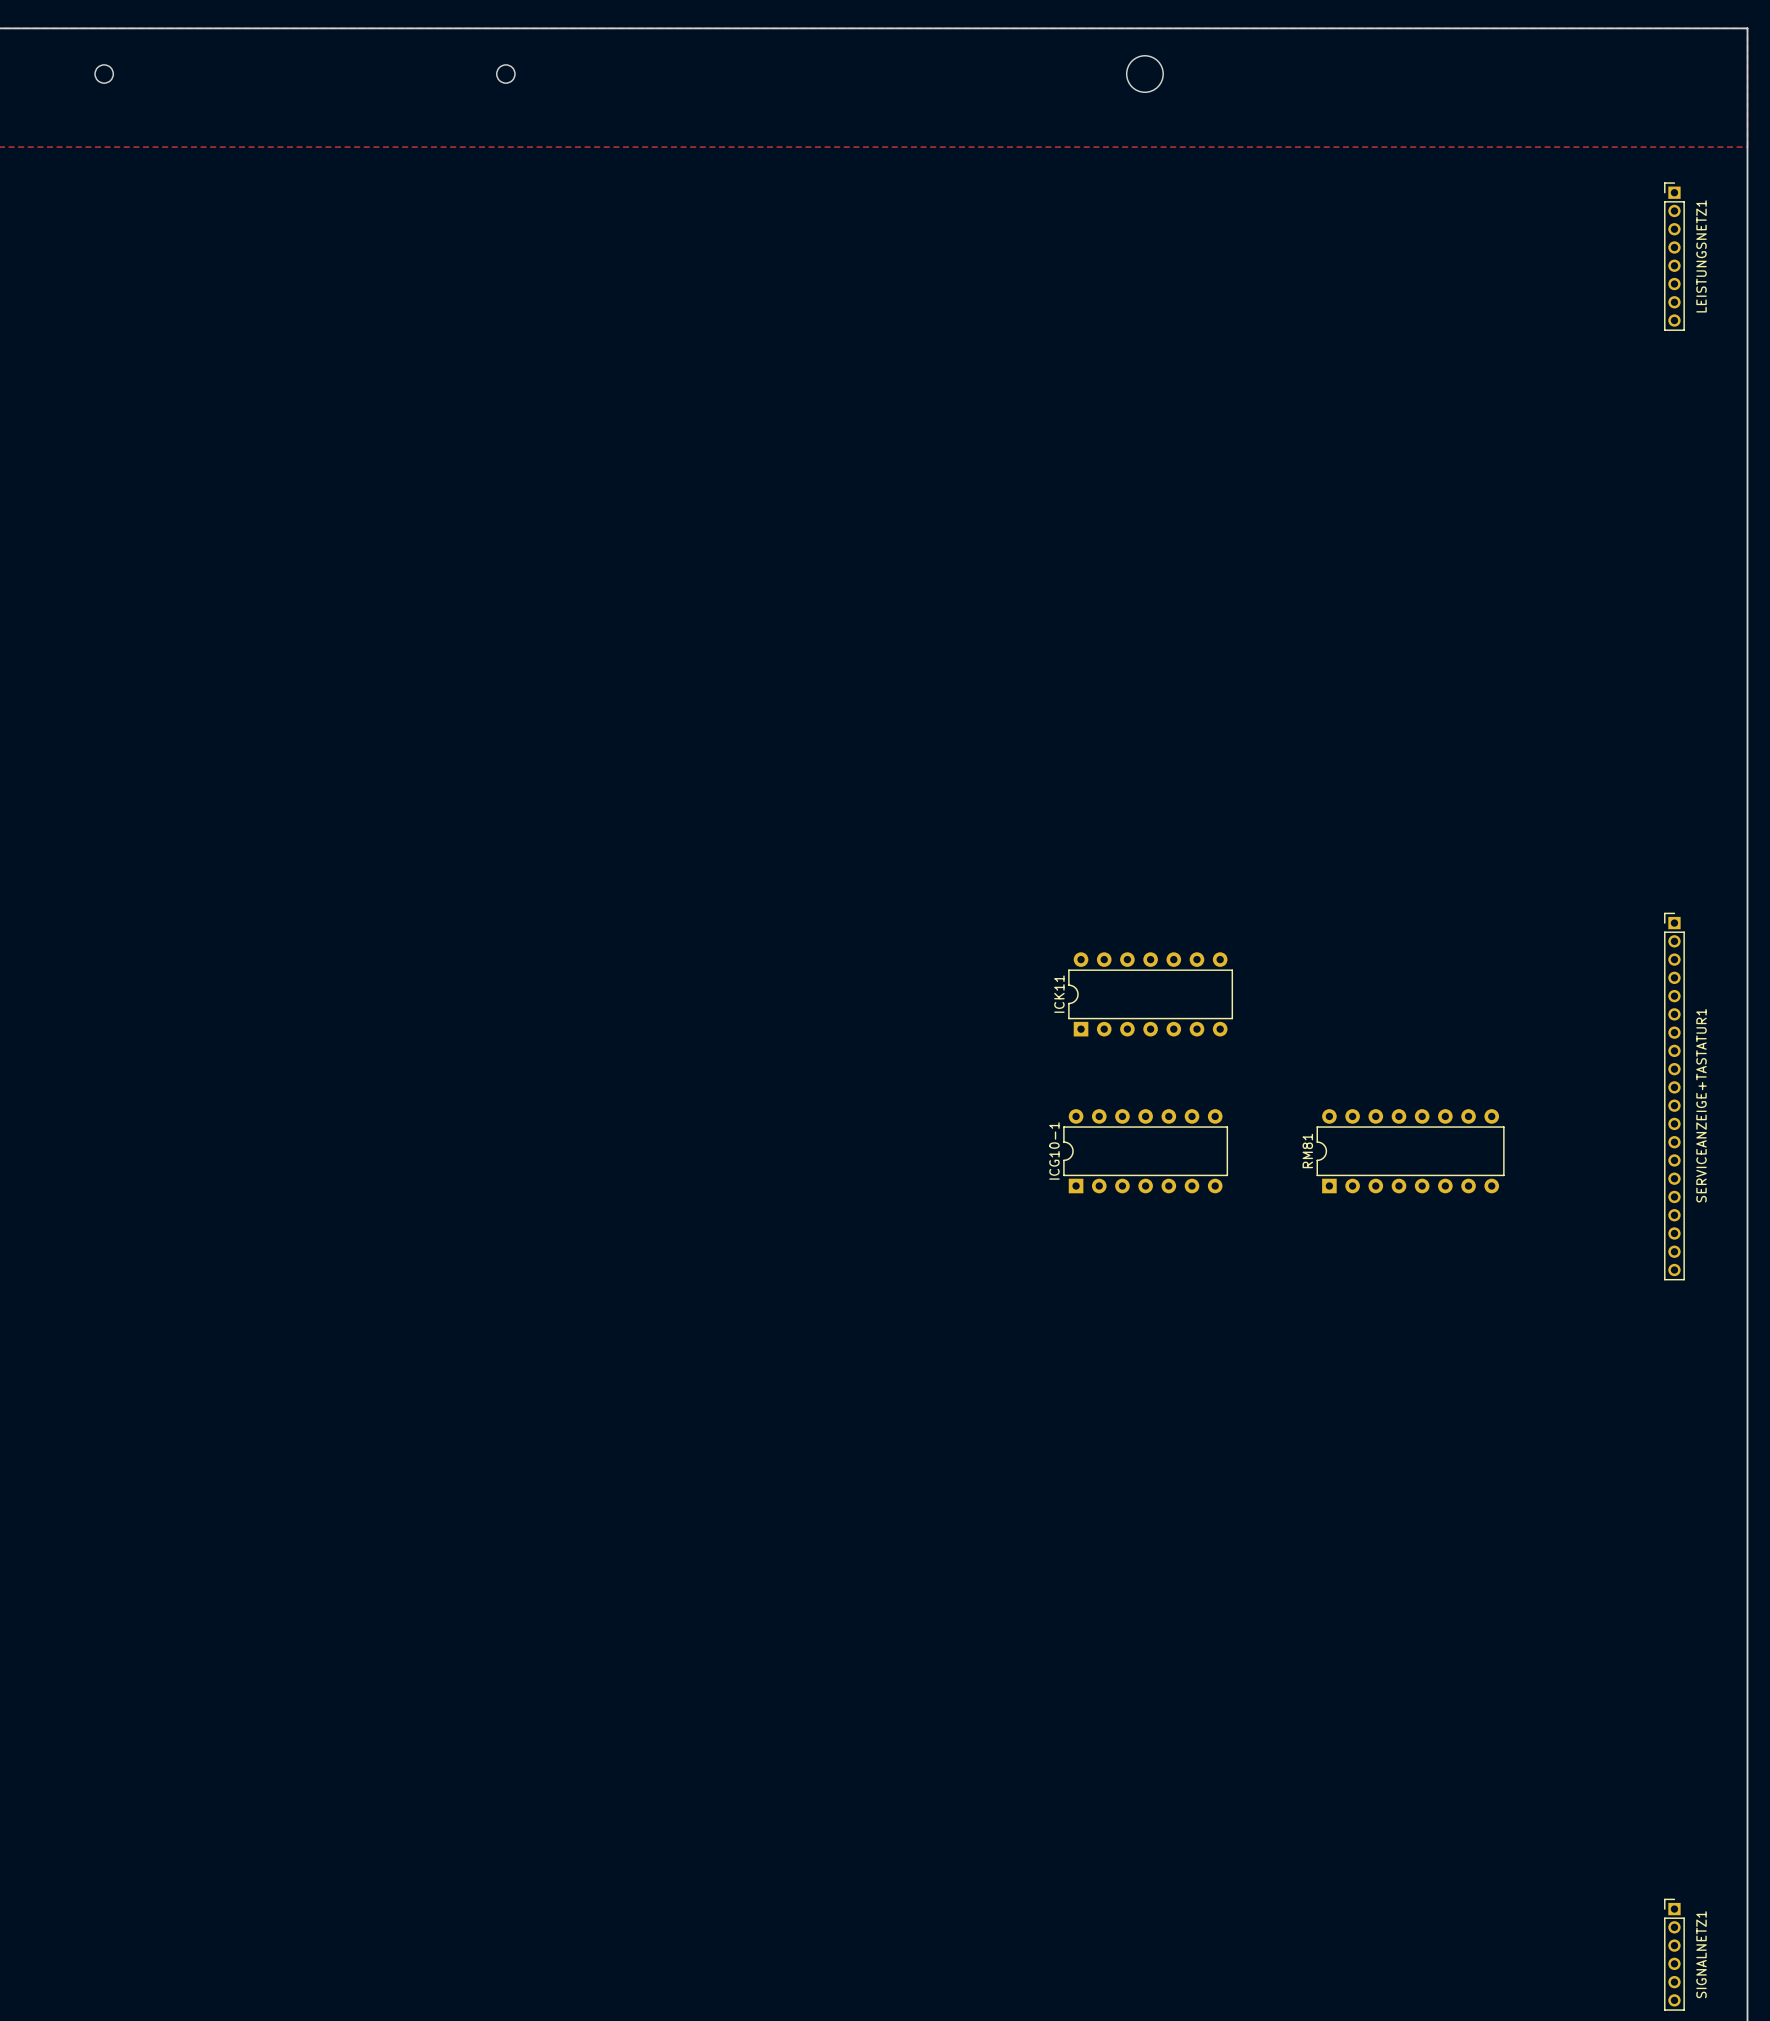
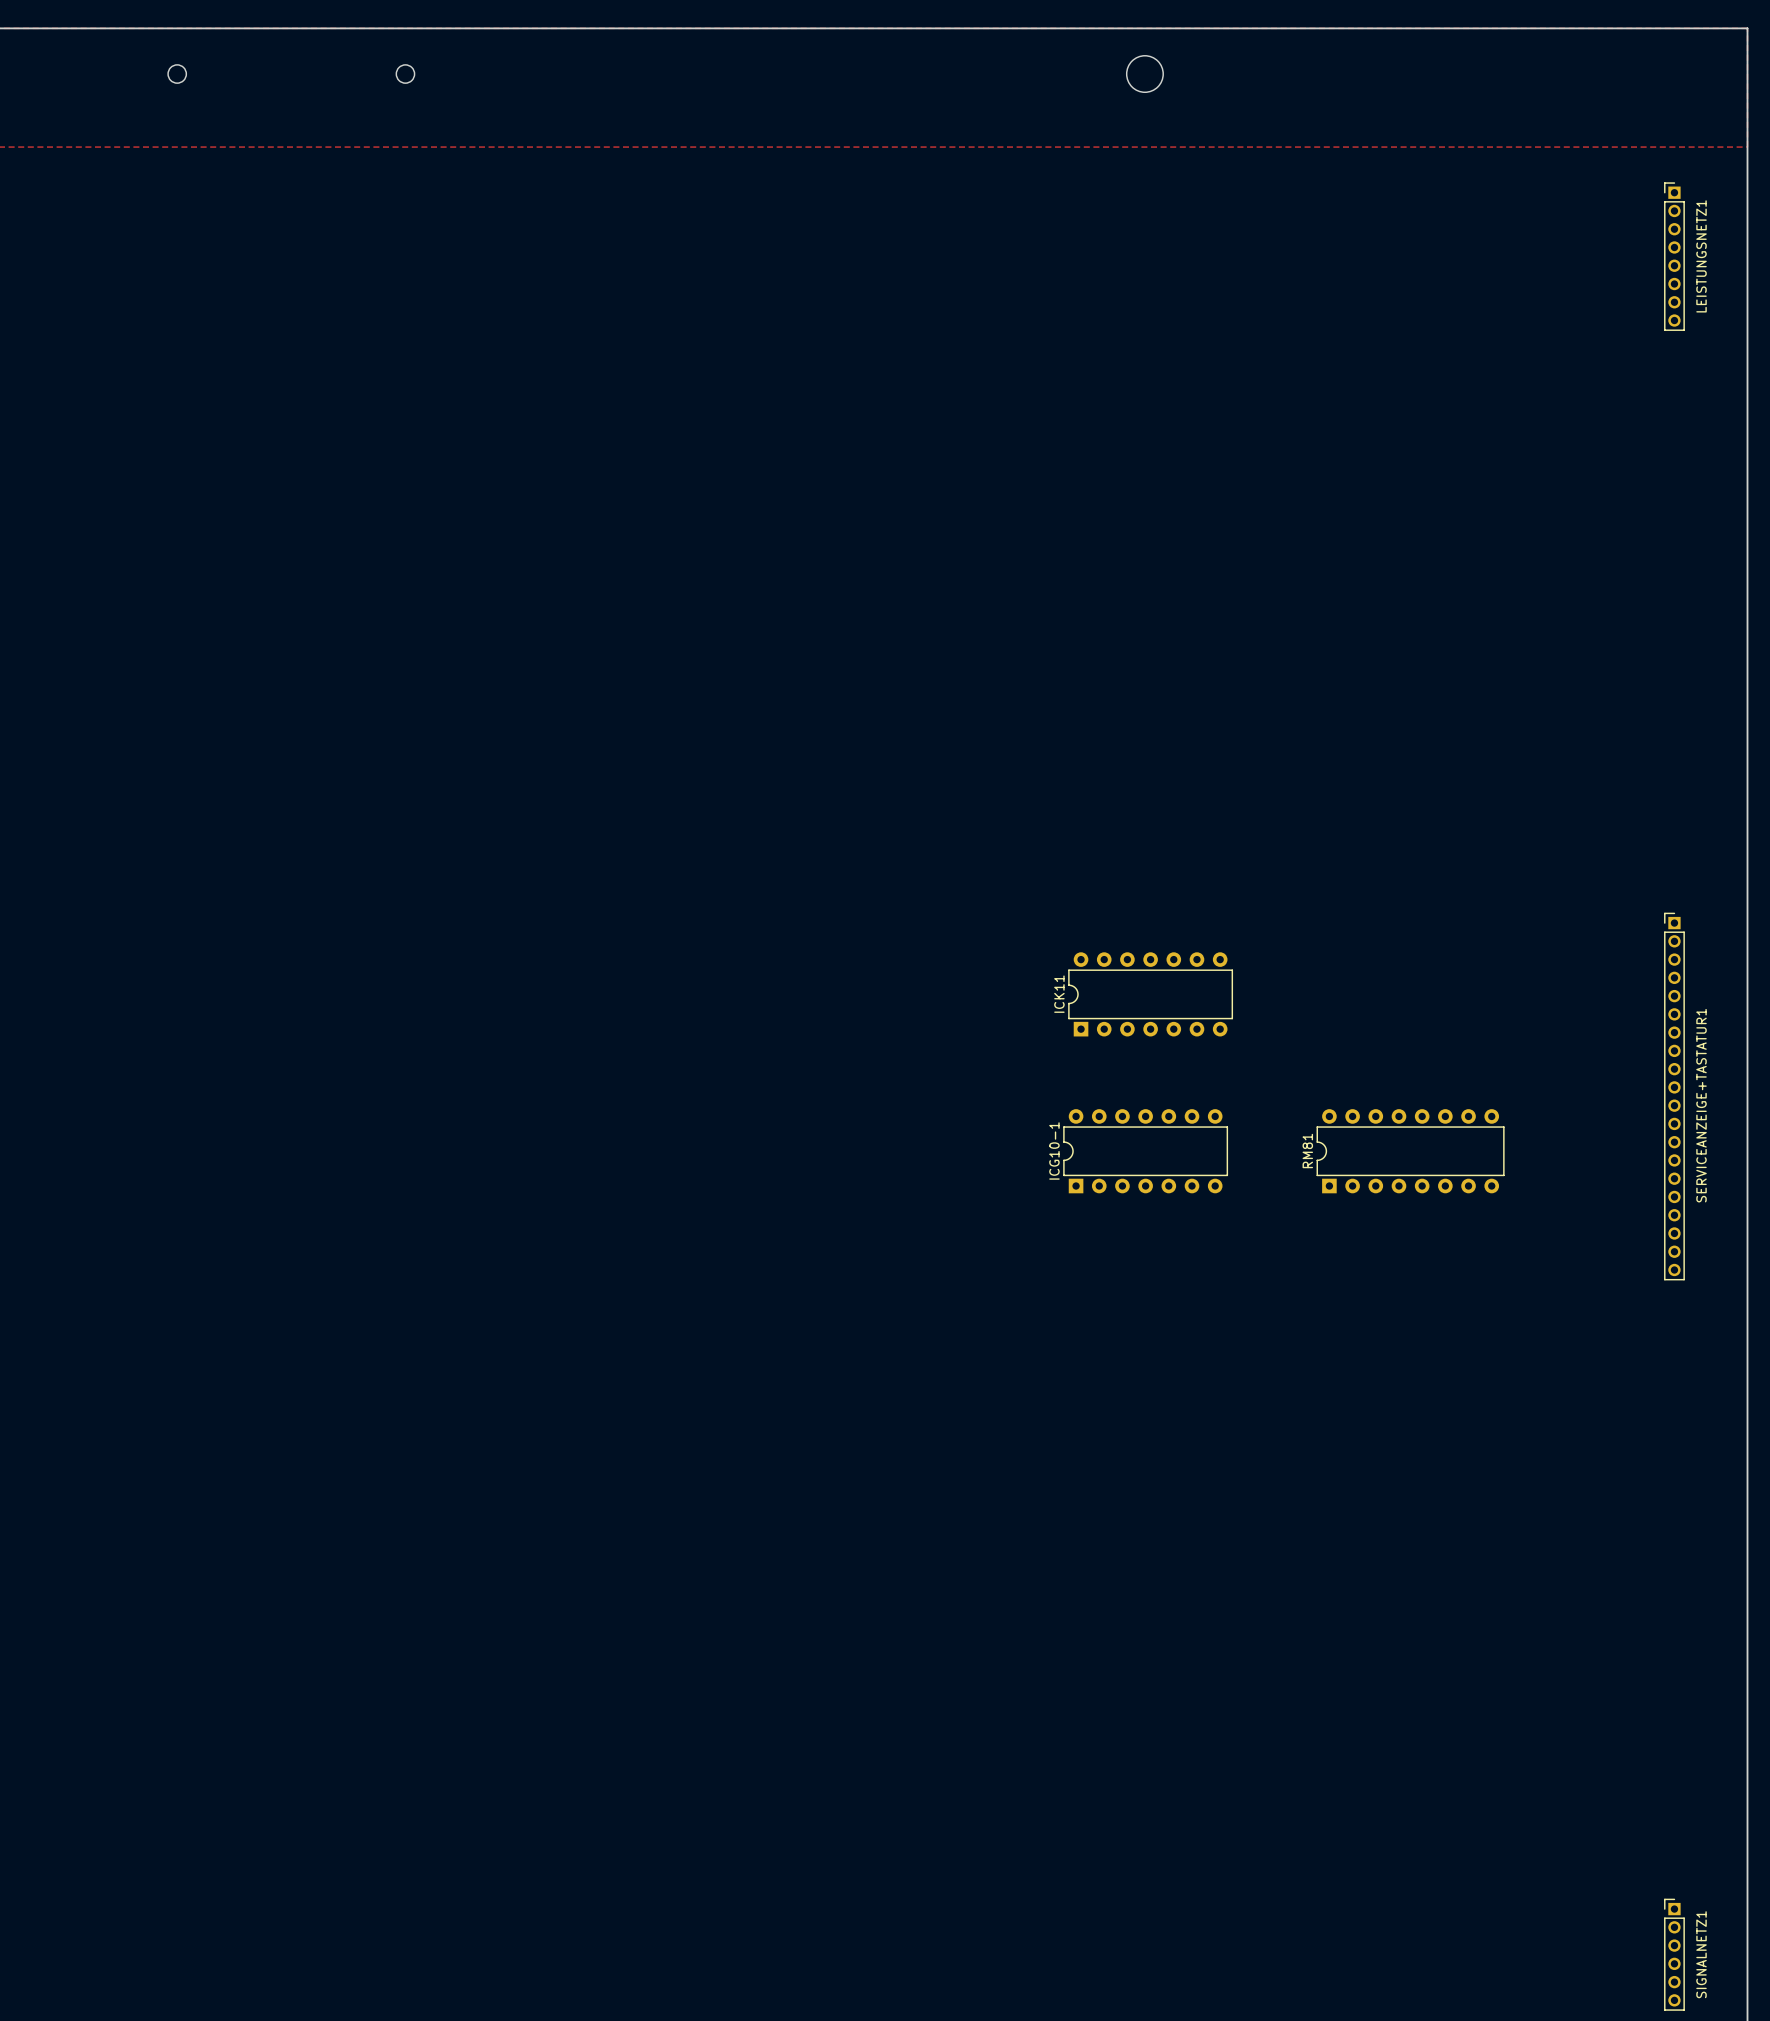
round board edge position: (104, 74) -> (177, 74)
round board edge position: (505, 74) -> (405, 74)

